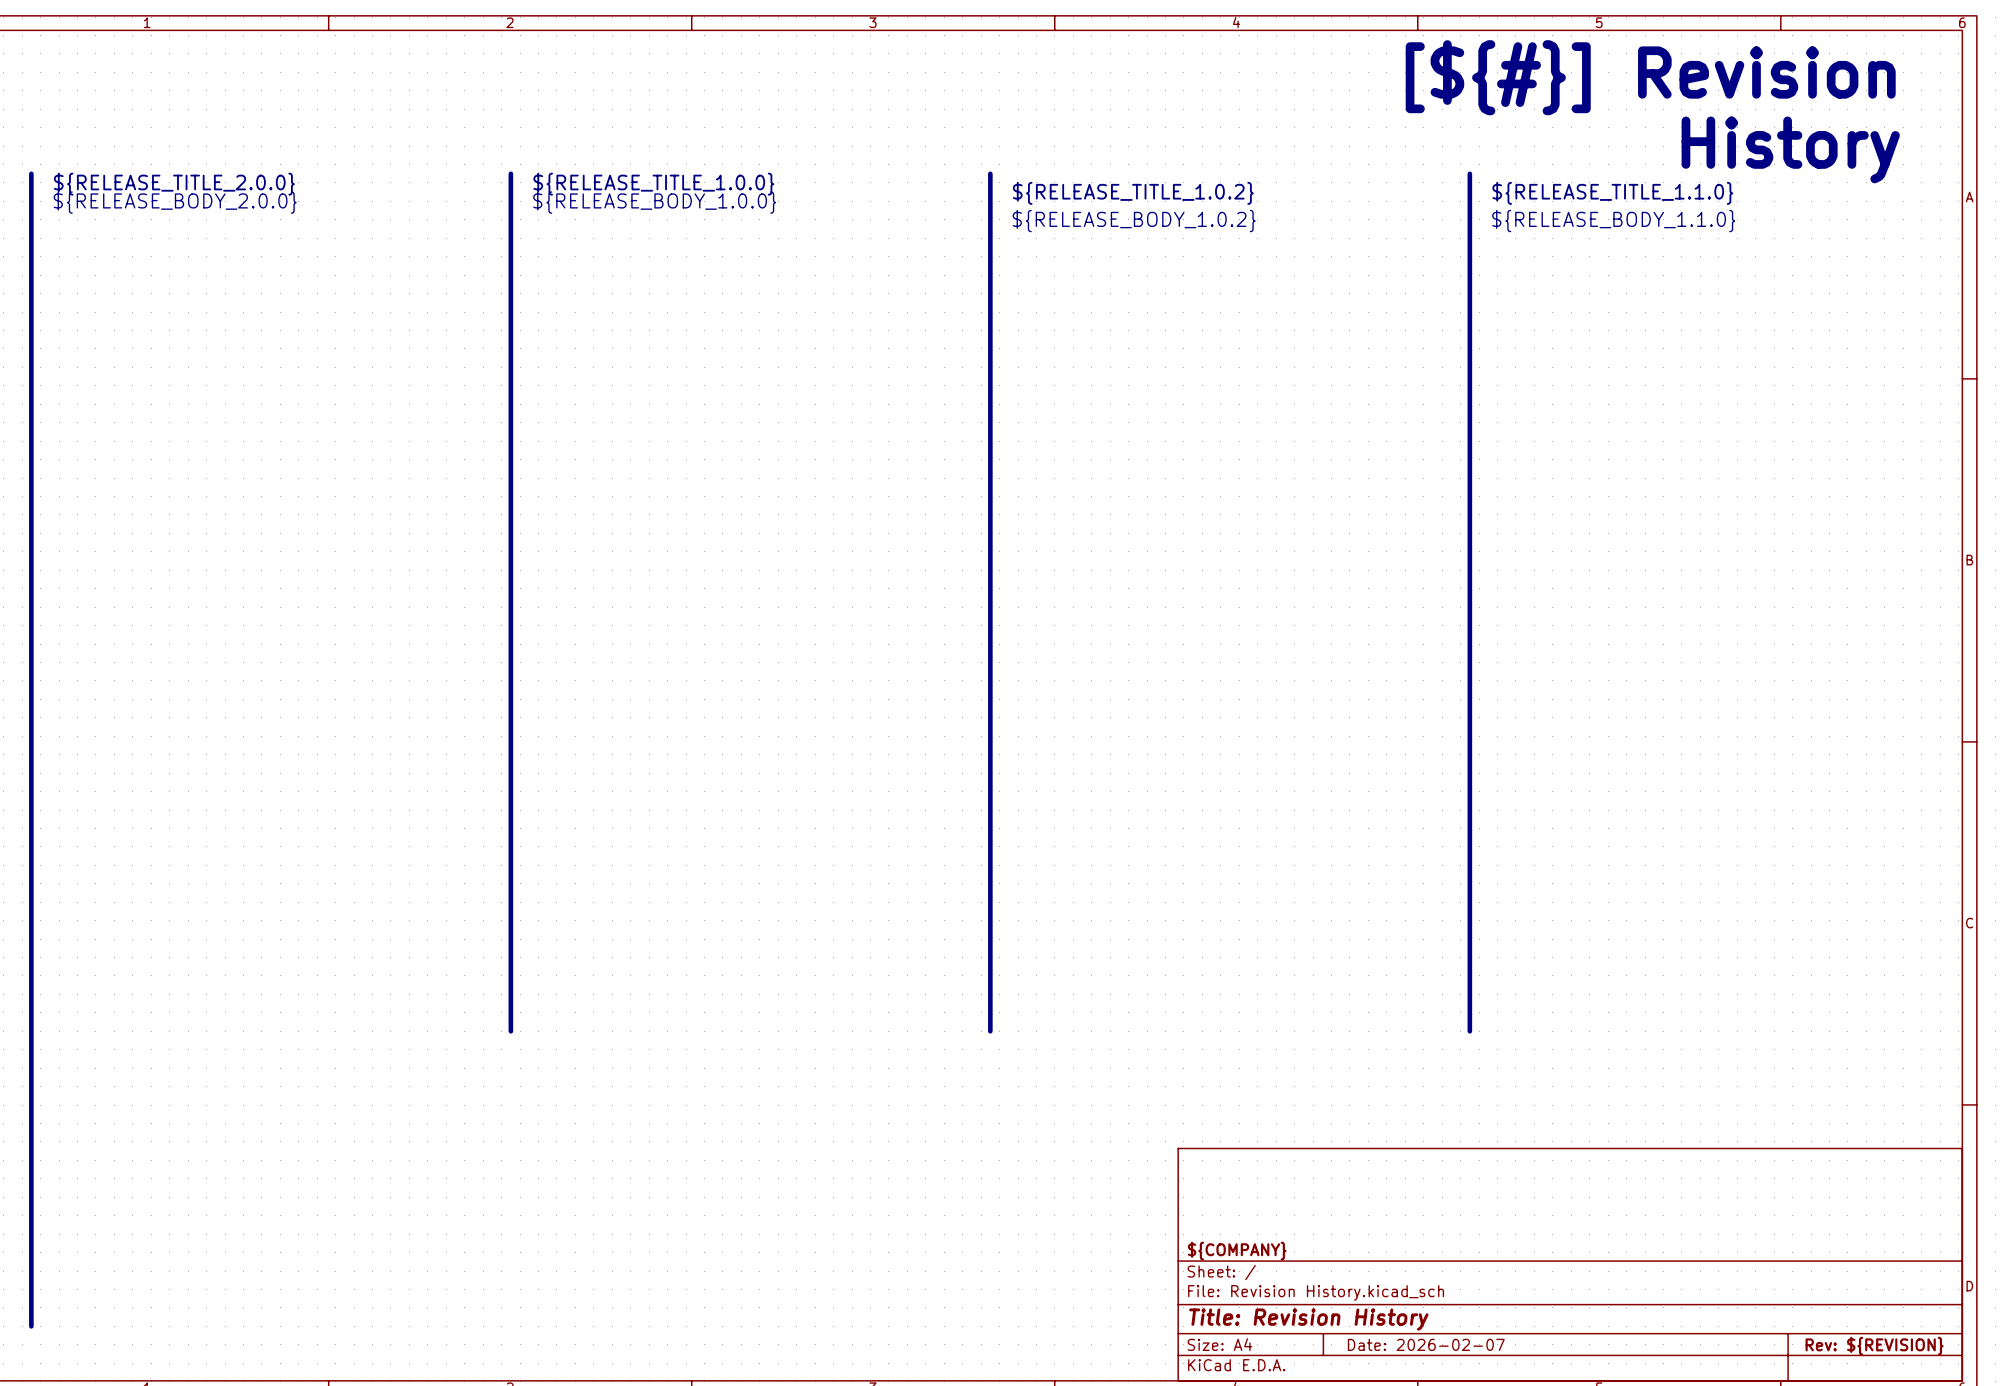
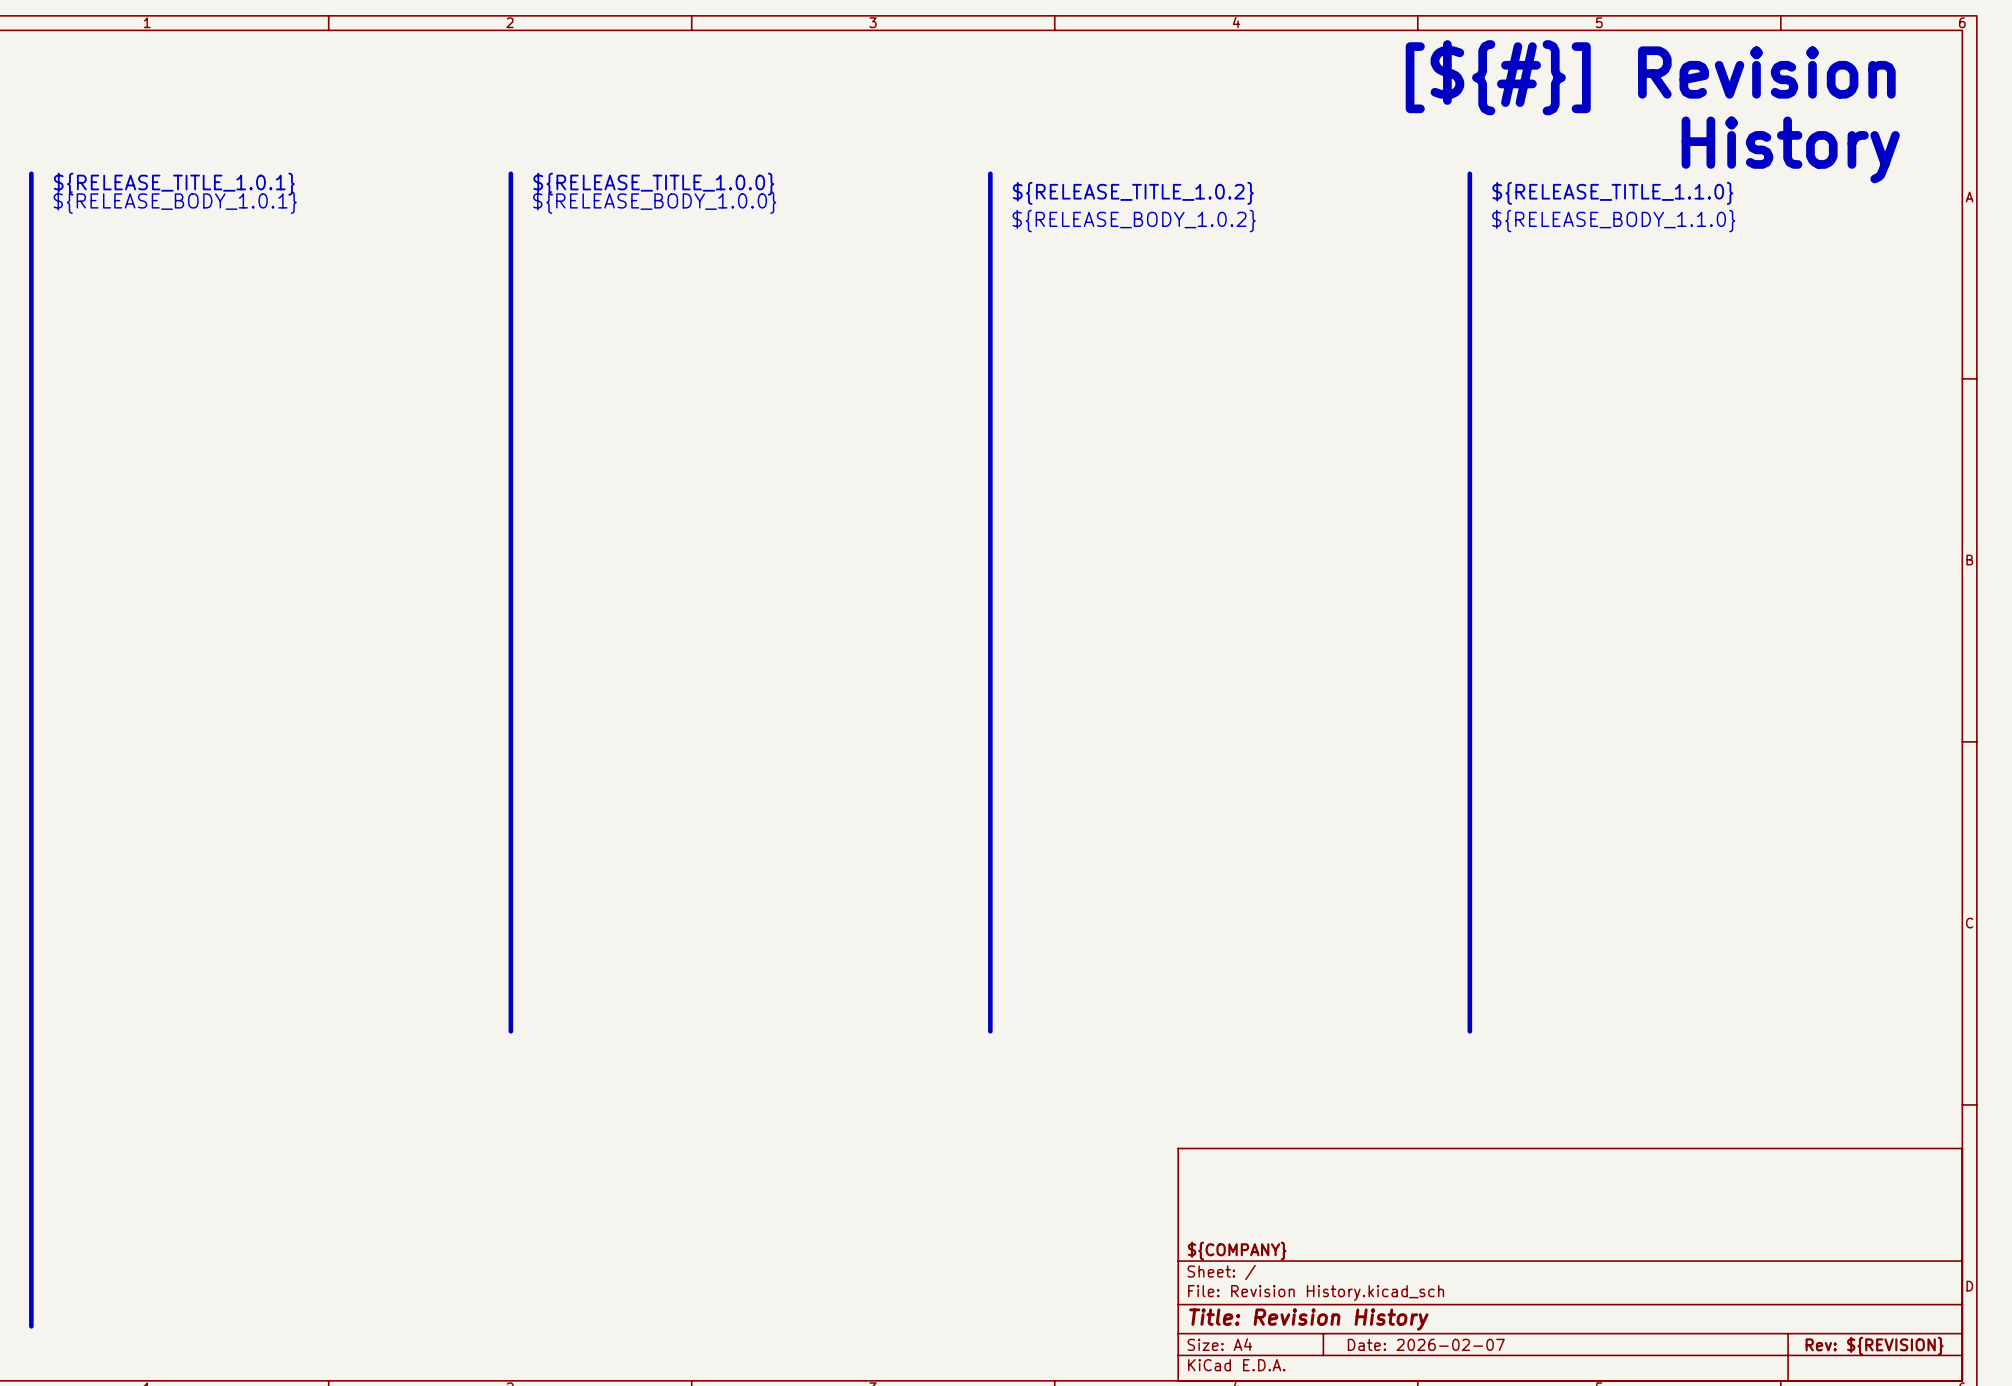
text: ${RELEASE_TITLE_2.0.0} (174, 184) -> ${RELEASE_TITLE_1.0.1} (174, 184)
text: ${RELEASE_BODY_2.0.0} (175, 202) -> ${RELEASE_BODY_1.0.1} (175, 202)

